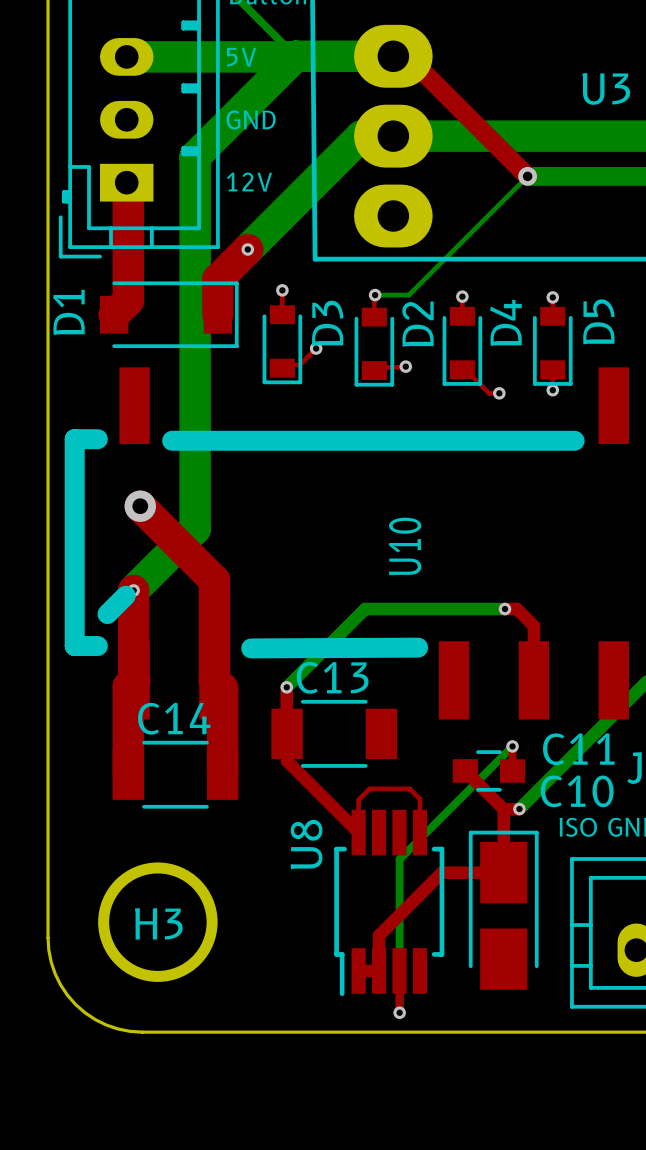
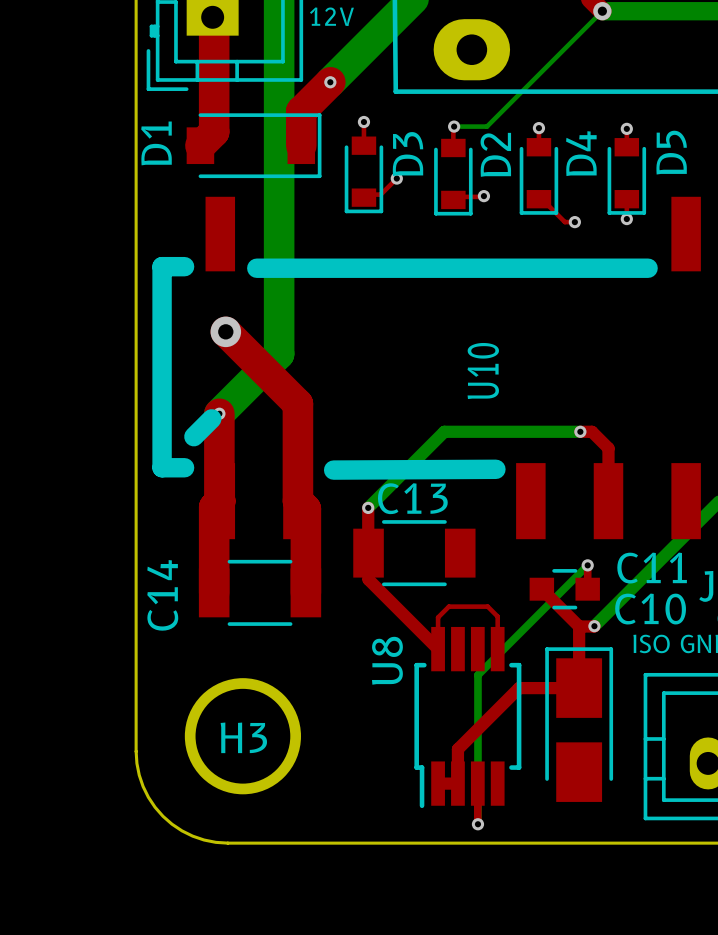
C14 name rotation: 0° (174, 718) -> 90° counterclockwise (162, 595)
C14 name position: C14 (174, 718) -> C14 (162, 595)

